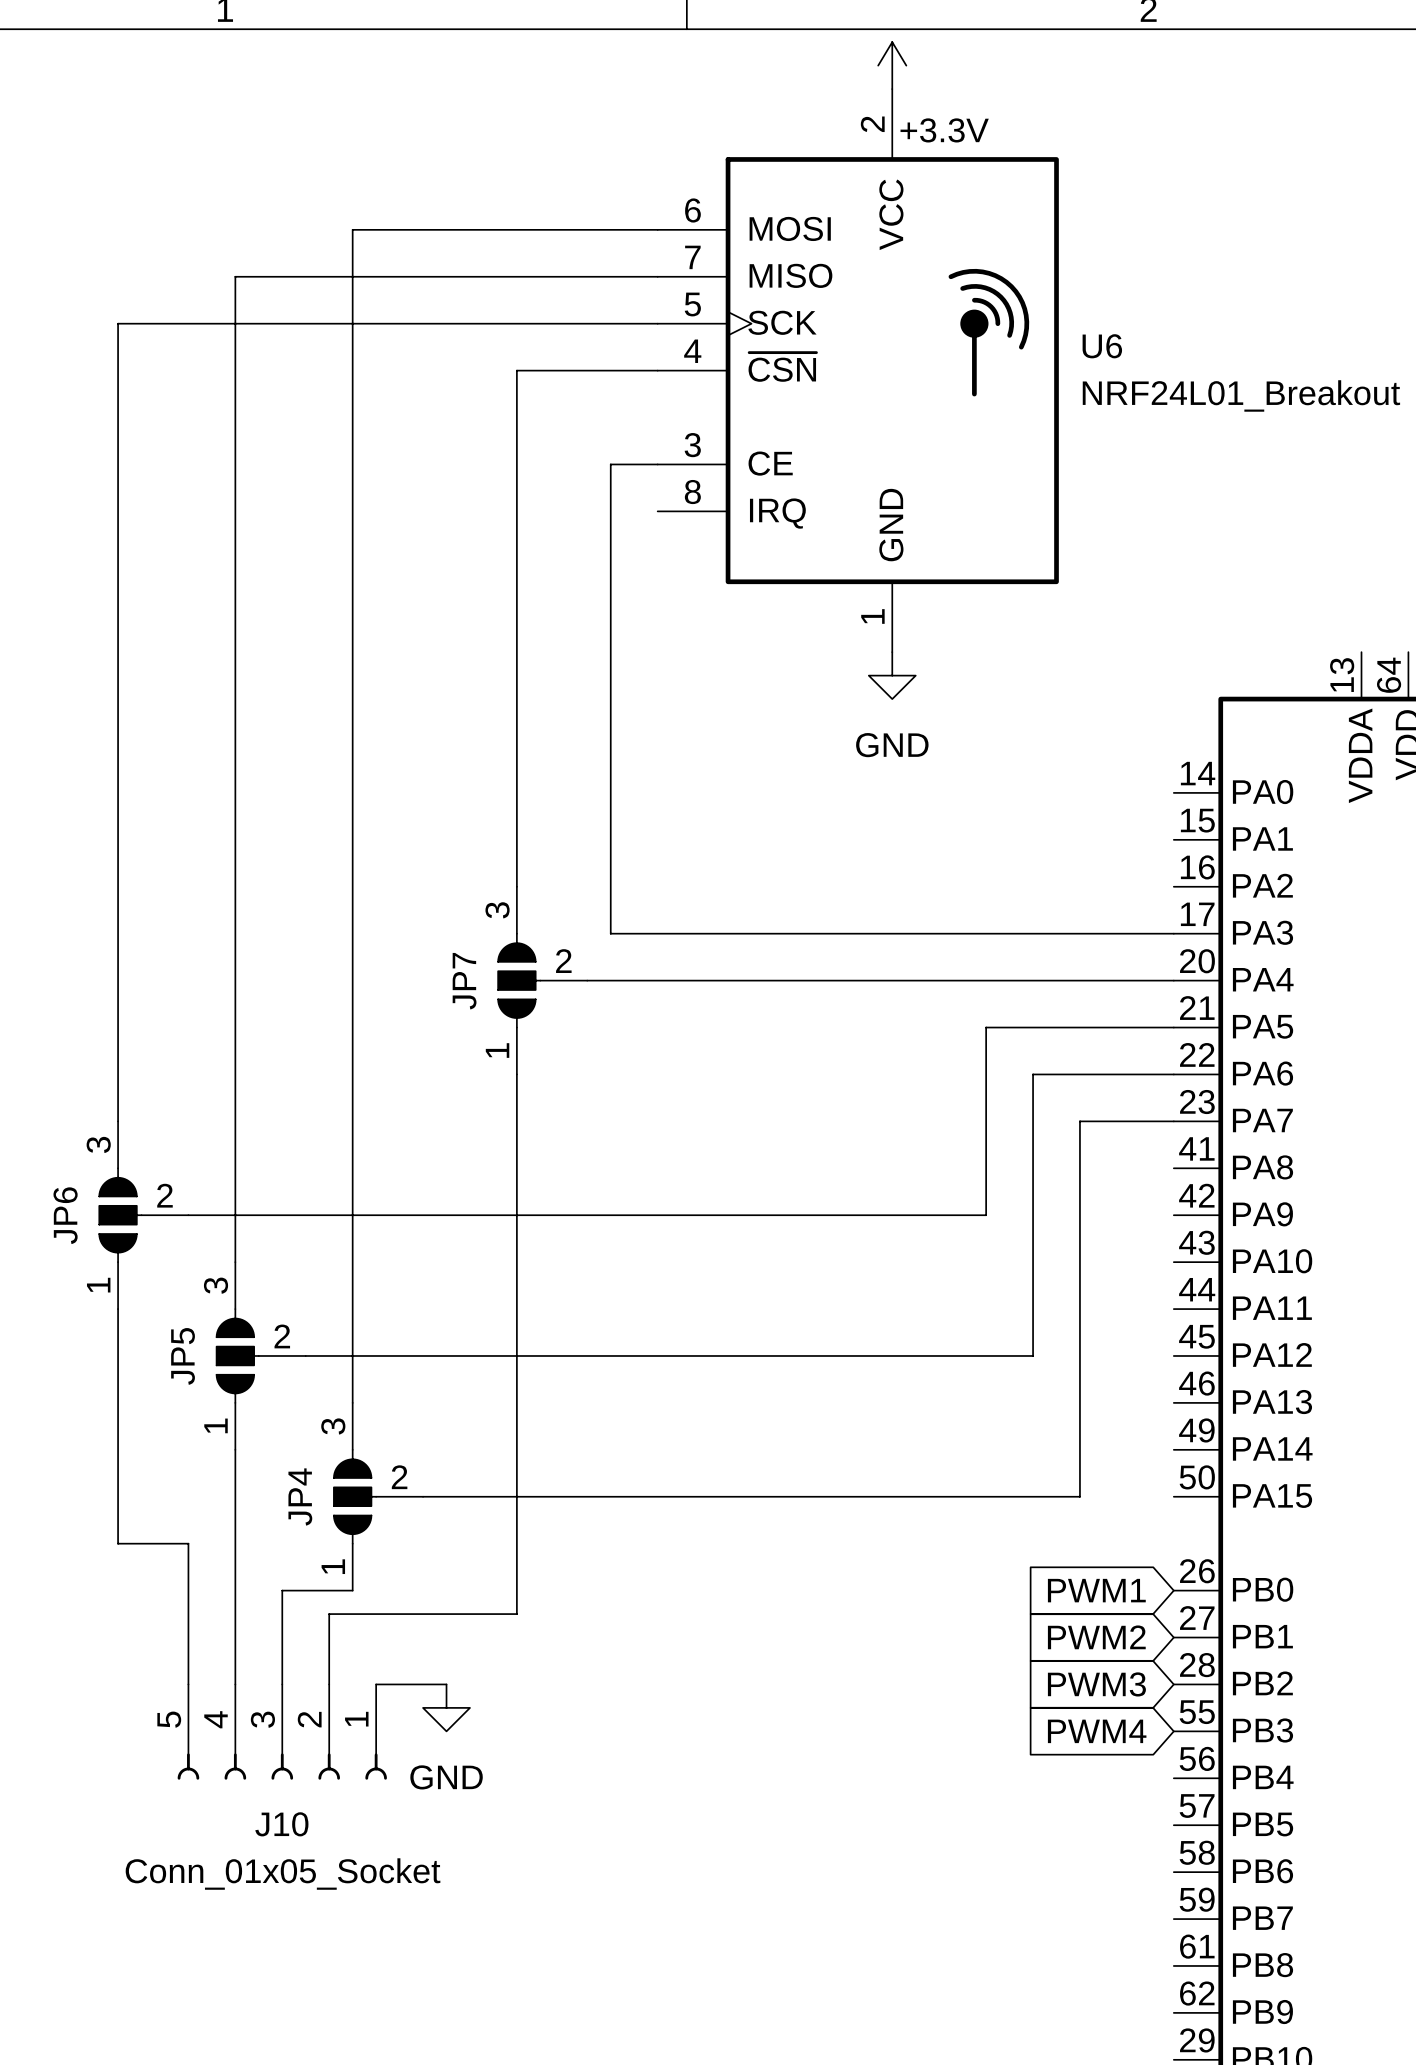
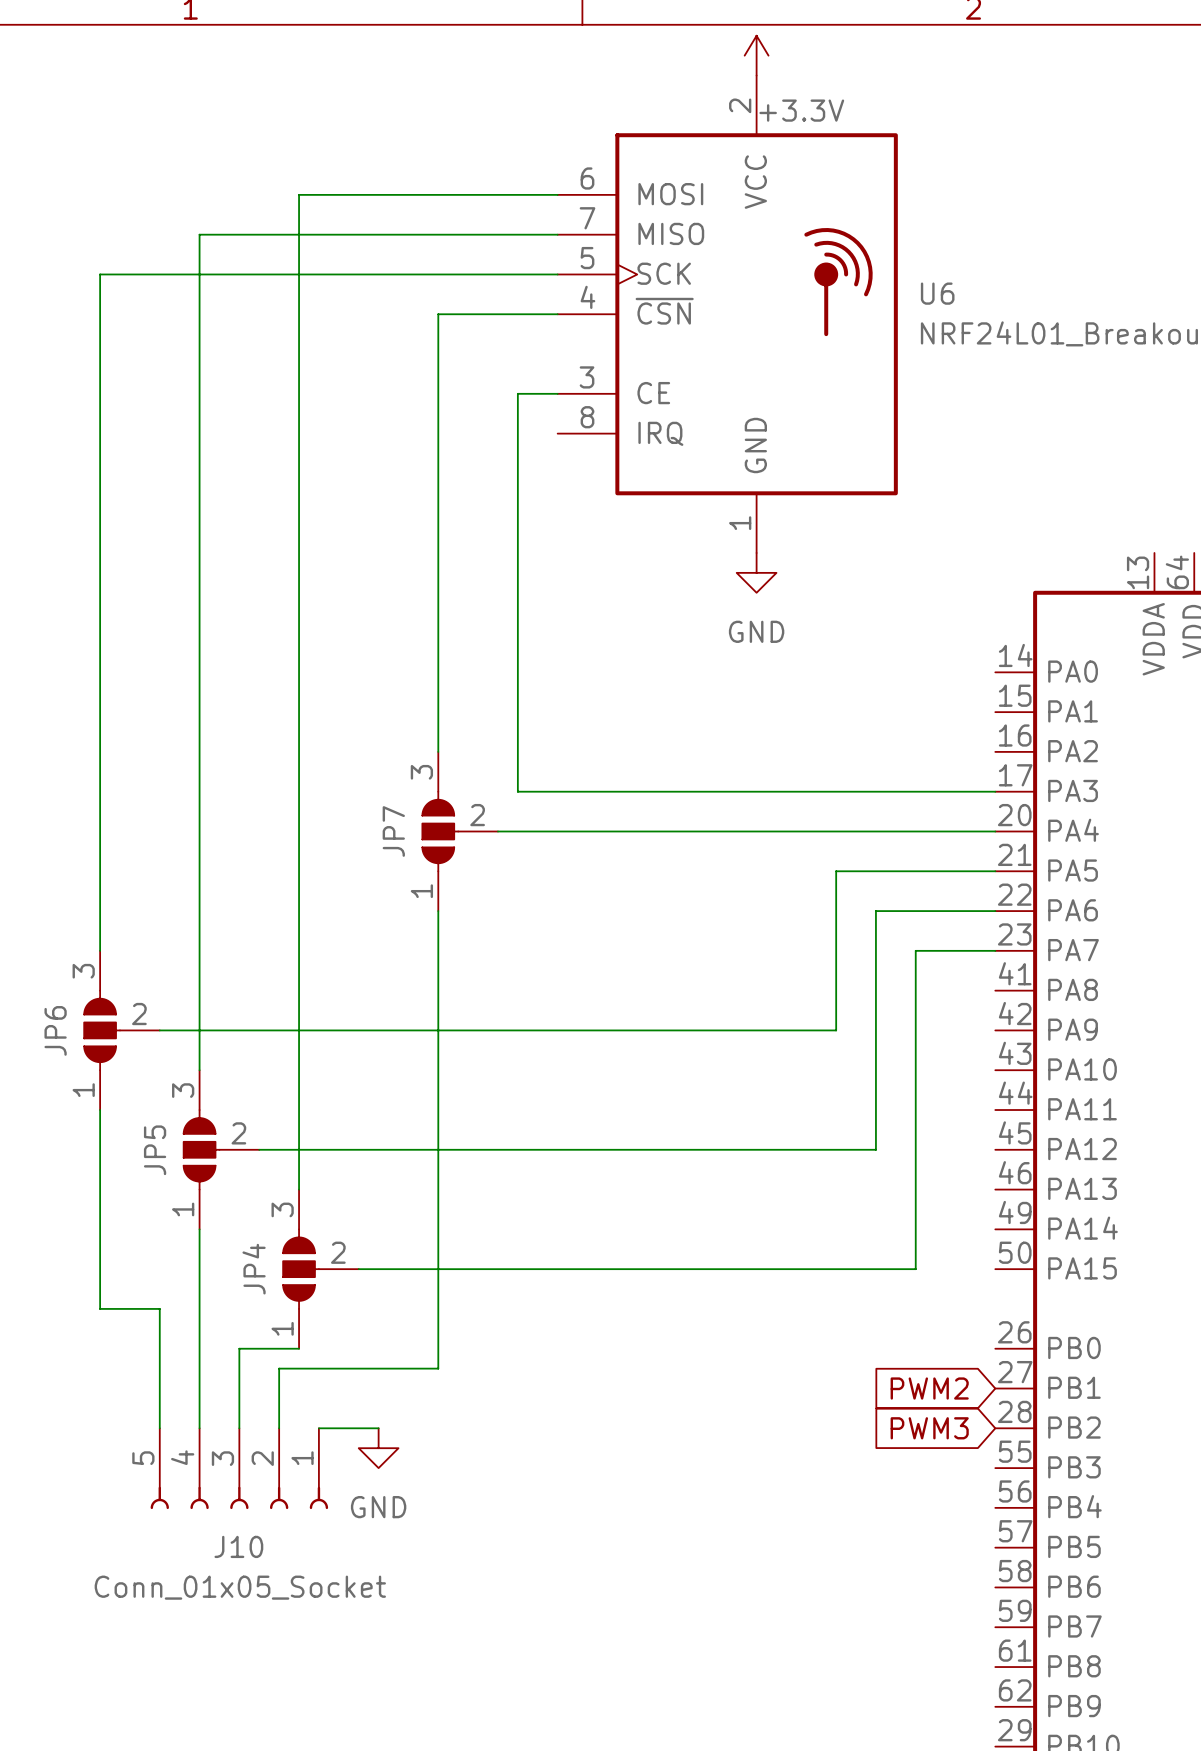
global label: PWM1 (1096, 1590) -> none
global label: PWM4 (1097, 1731) -> none

